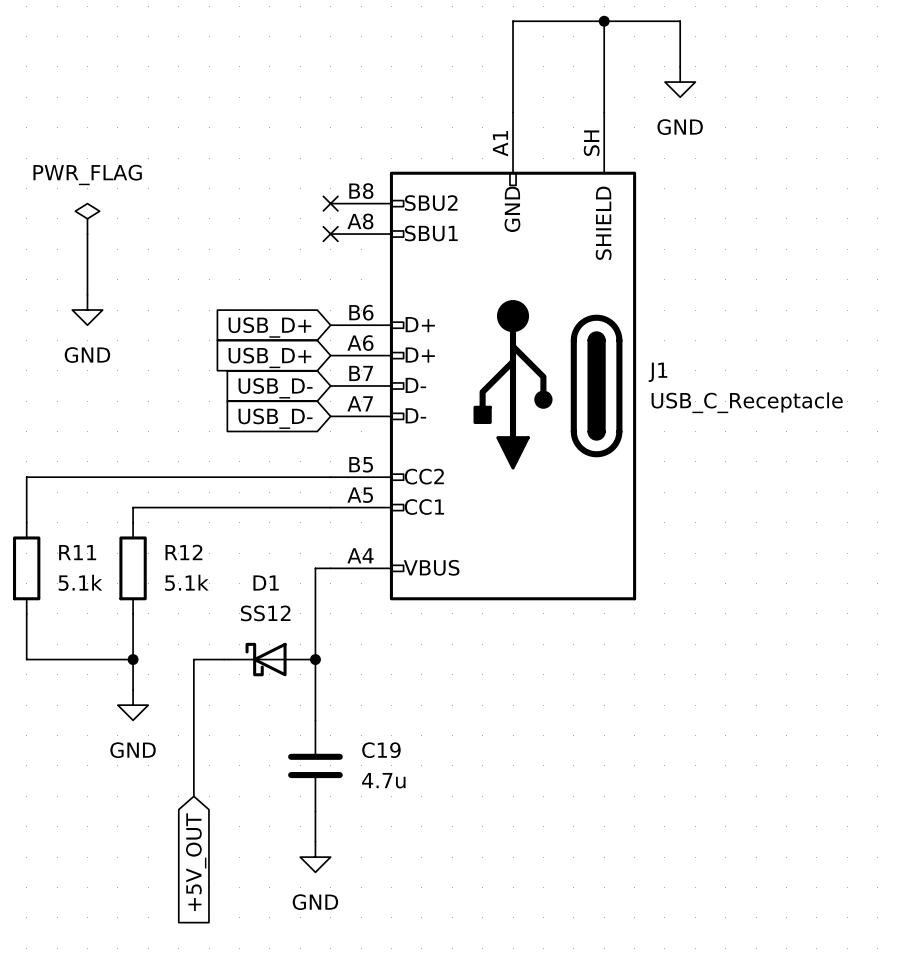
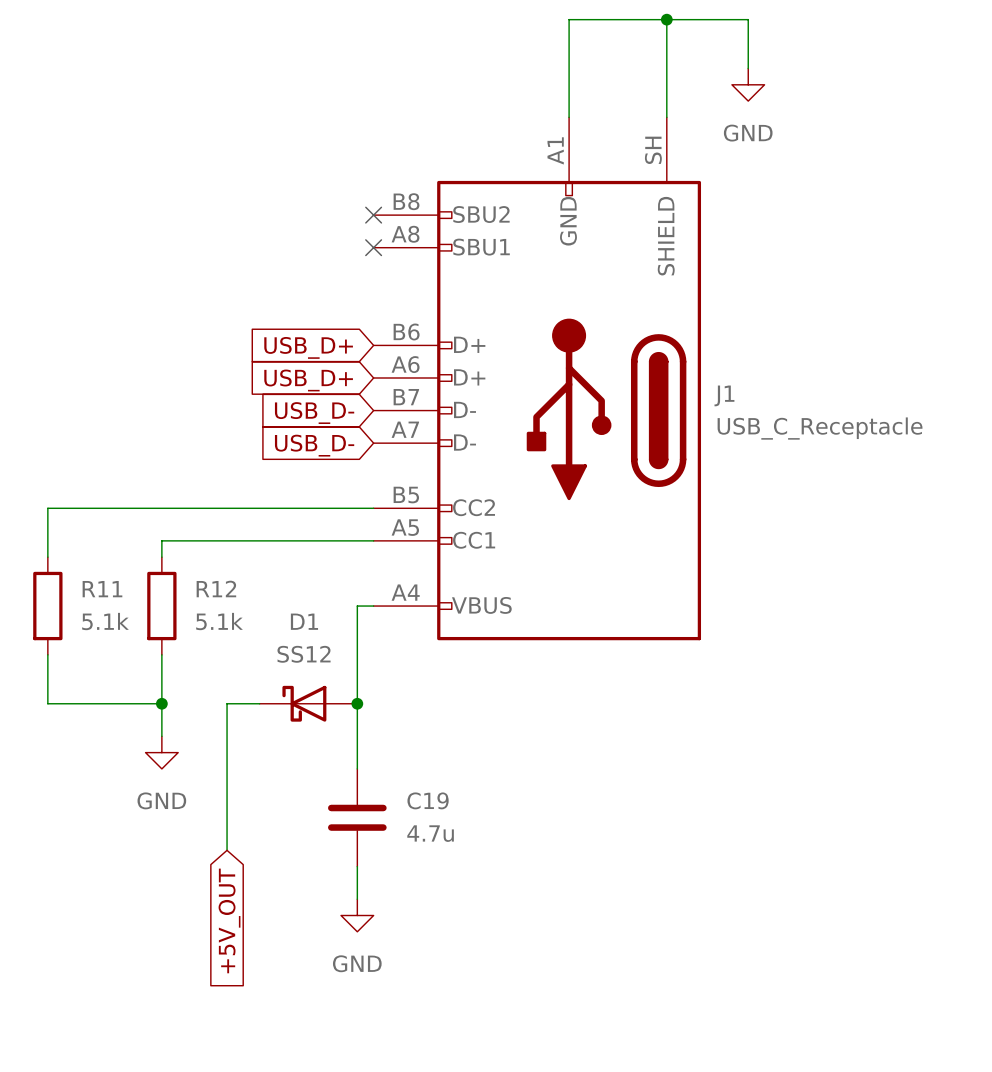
power symbol: PWR_FLAG (87, 218) -> none
wire: (87, 234) (87, 294) -> none
power symbol: GND (87, 310) -> none

